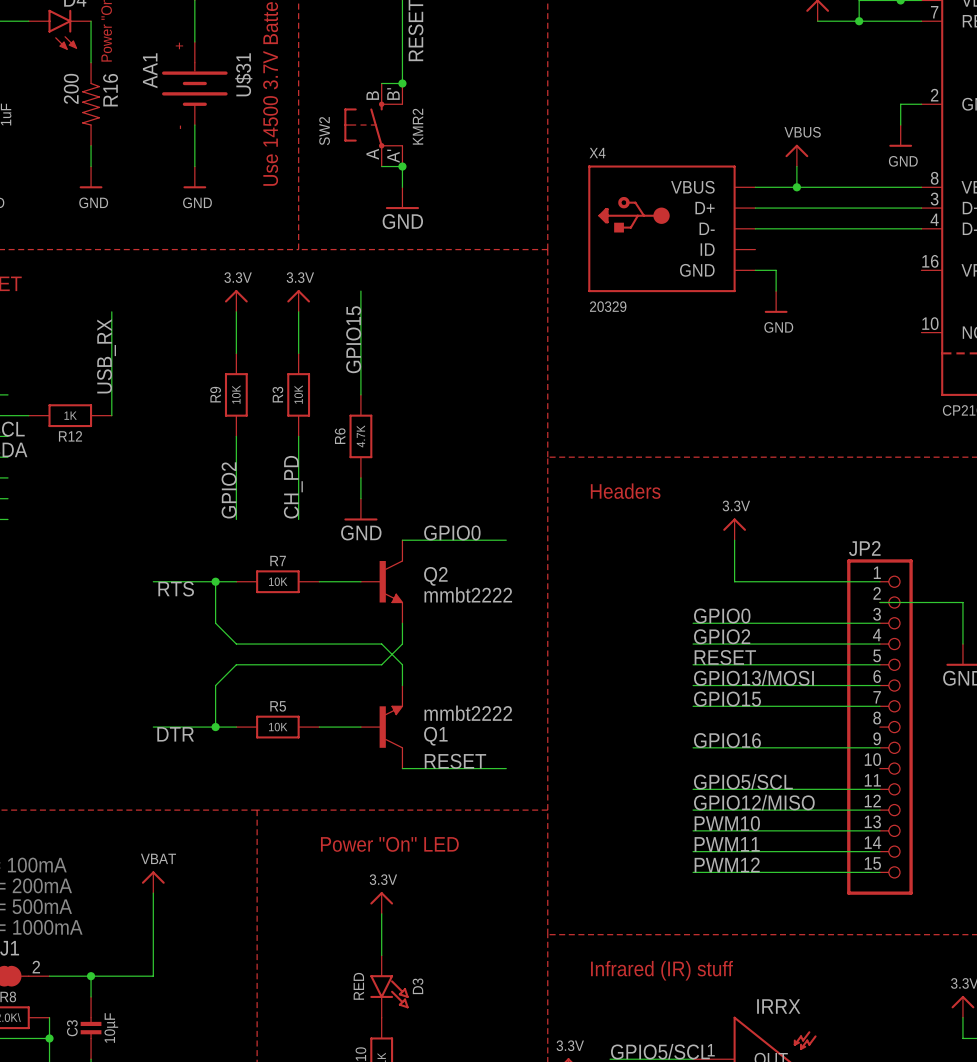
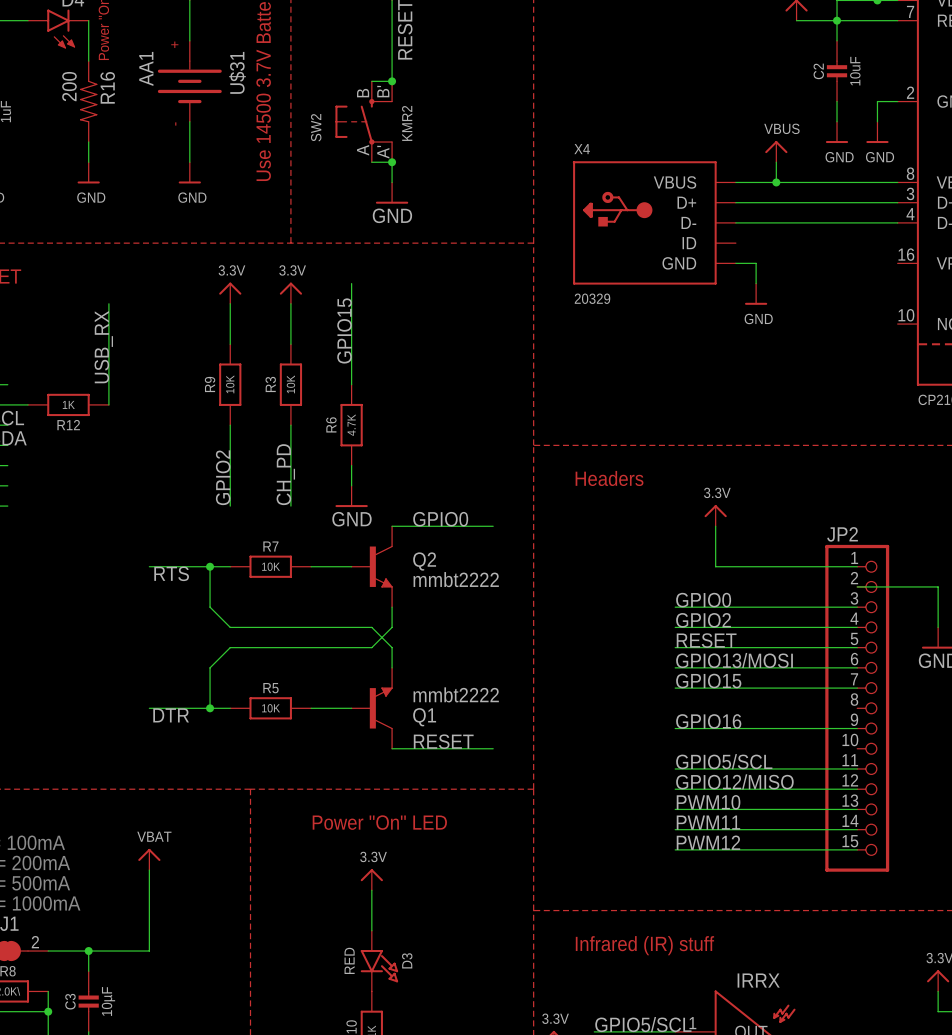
wire: none -> (837, 20) (837, 40)
C2: none -> 10uF (837, 71)
wire: none -> (837, 101) (837, 121)
power symbol: none -> GND (837, 132)

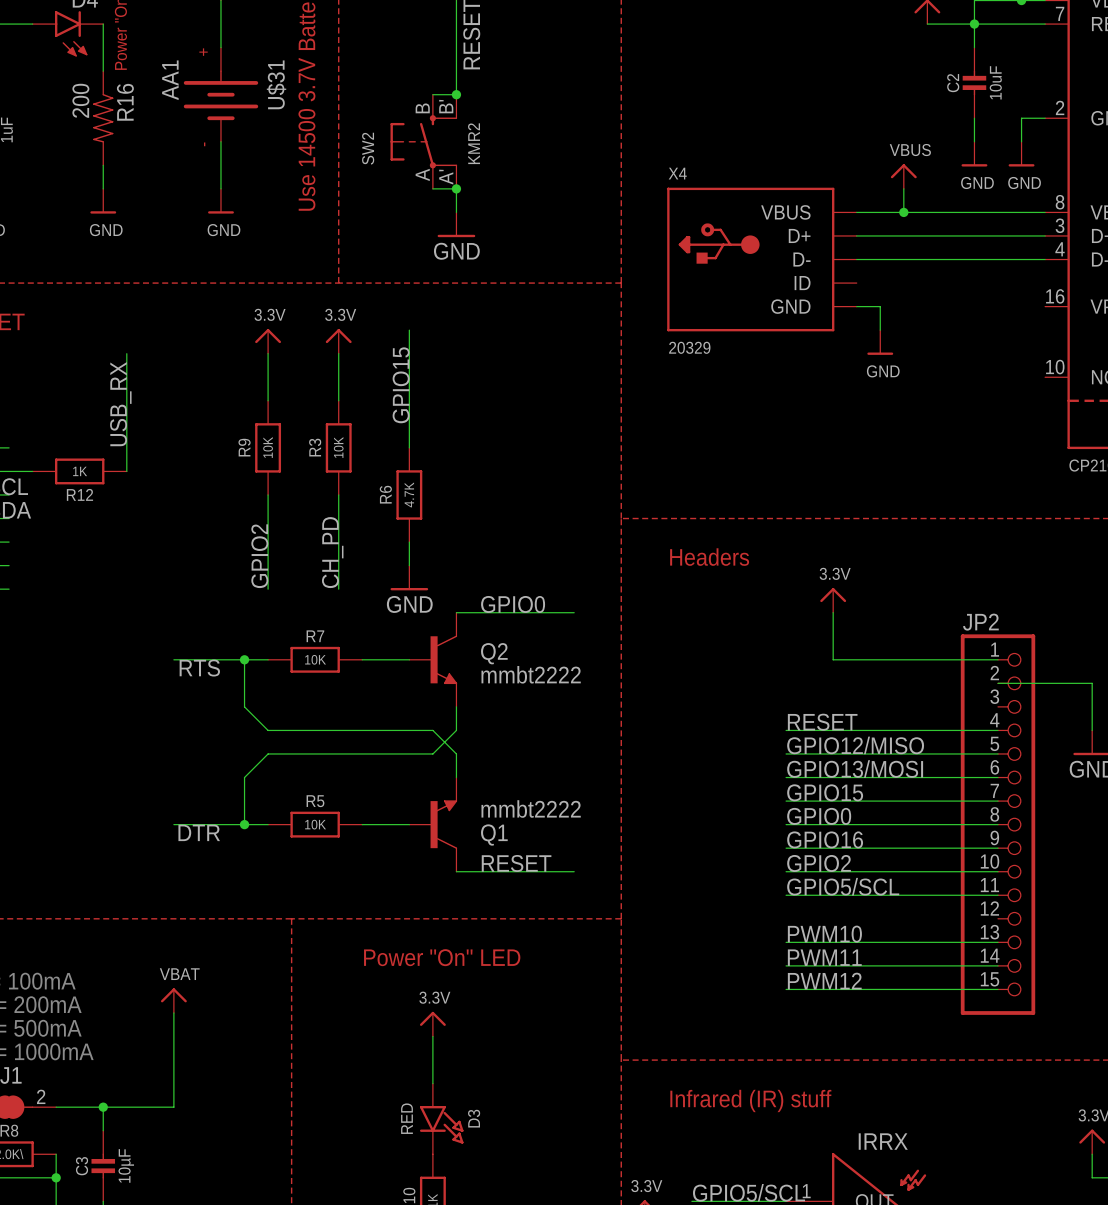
label position: GPIO0 (703, 600) -> GPIO0 (819, 816)
wire: (675, 607) (857, 607) -> (786, 824) (998, 824)
label: GPIO2 (703, 620) -> RESET (822, 722)
label: RESET (706, 640) -> GPIO12/MISO (855, 745)
label: none -> GPIO2 (819, 863)
label: GPIO12/MISO (734, 781) -> none
wire: (675, 789) (857, 789) -> (786, 871) (998, 871)

